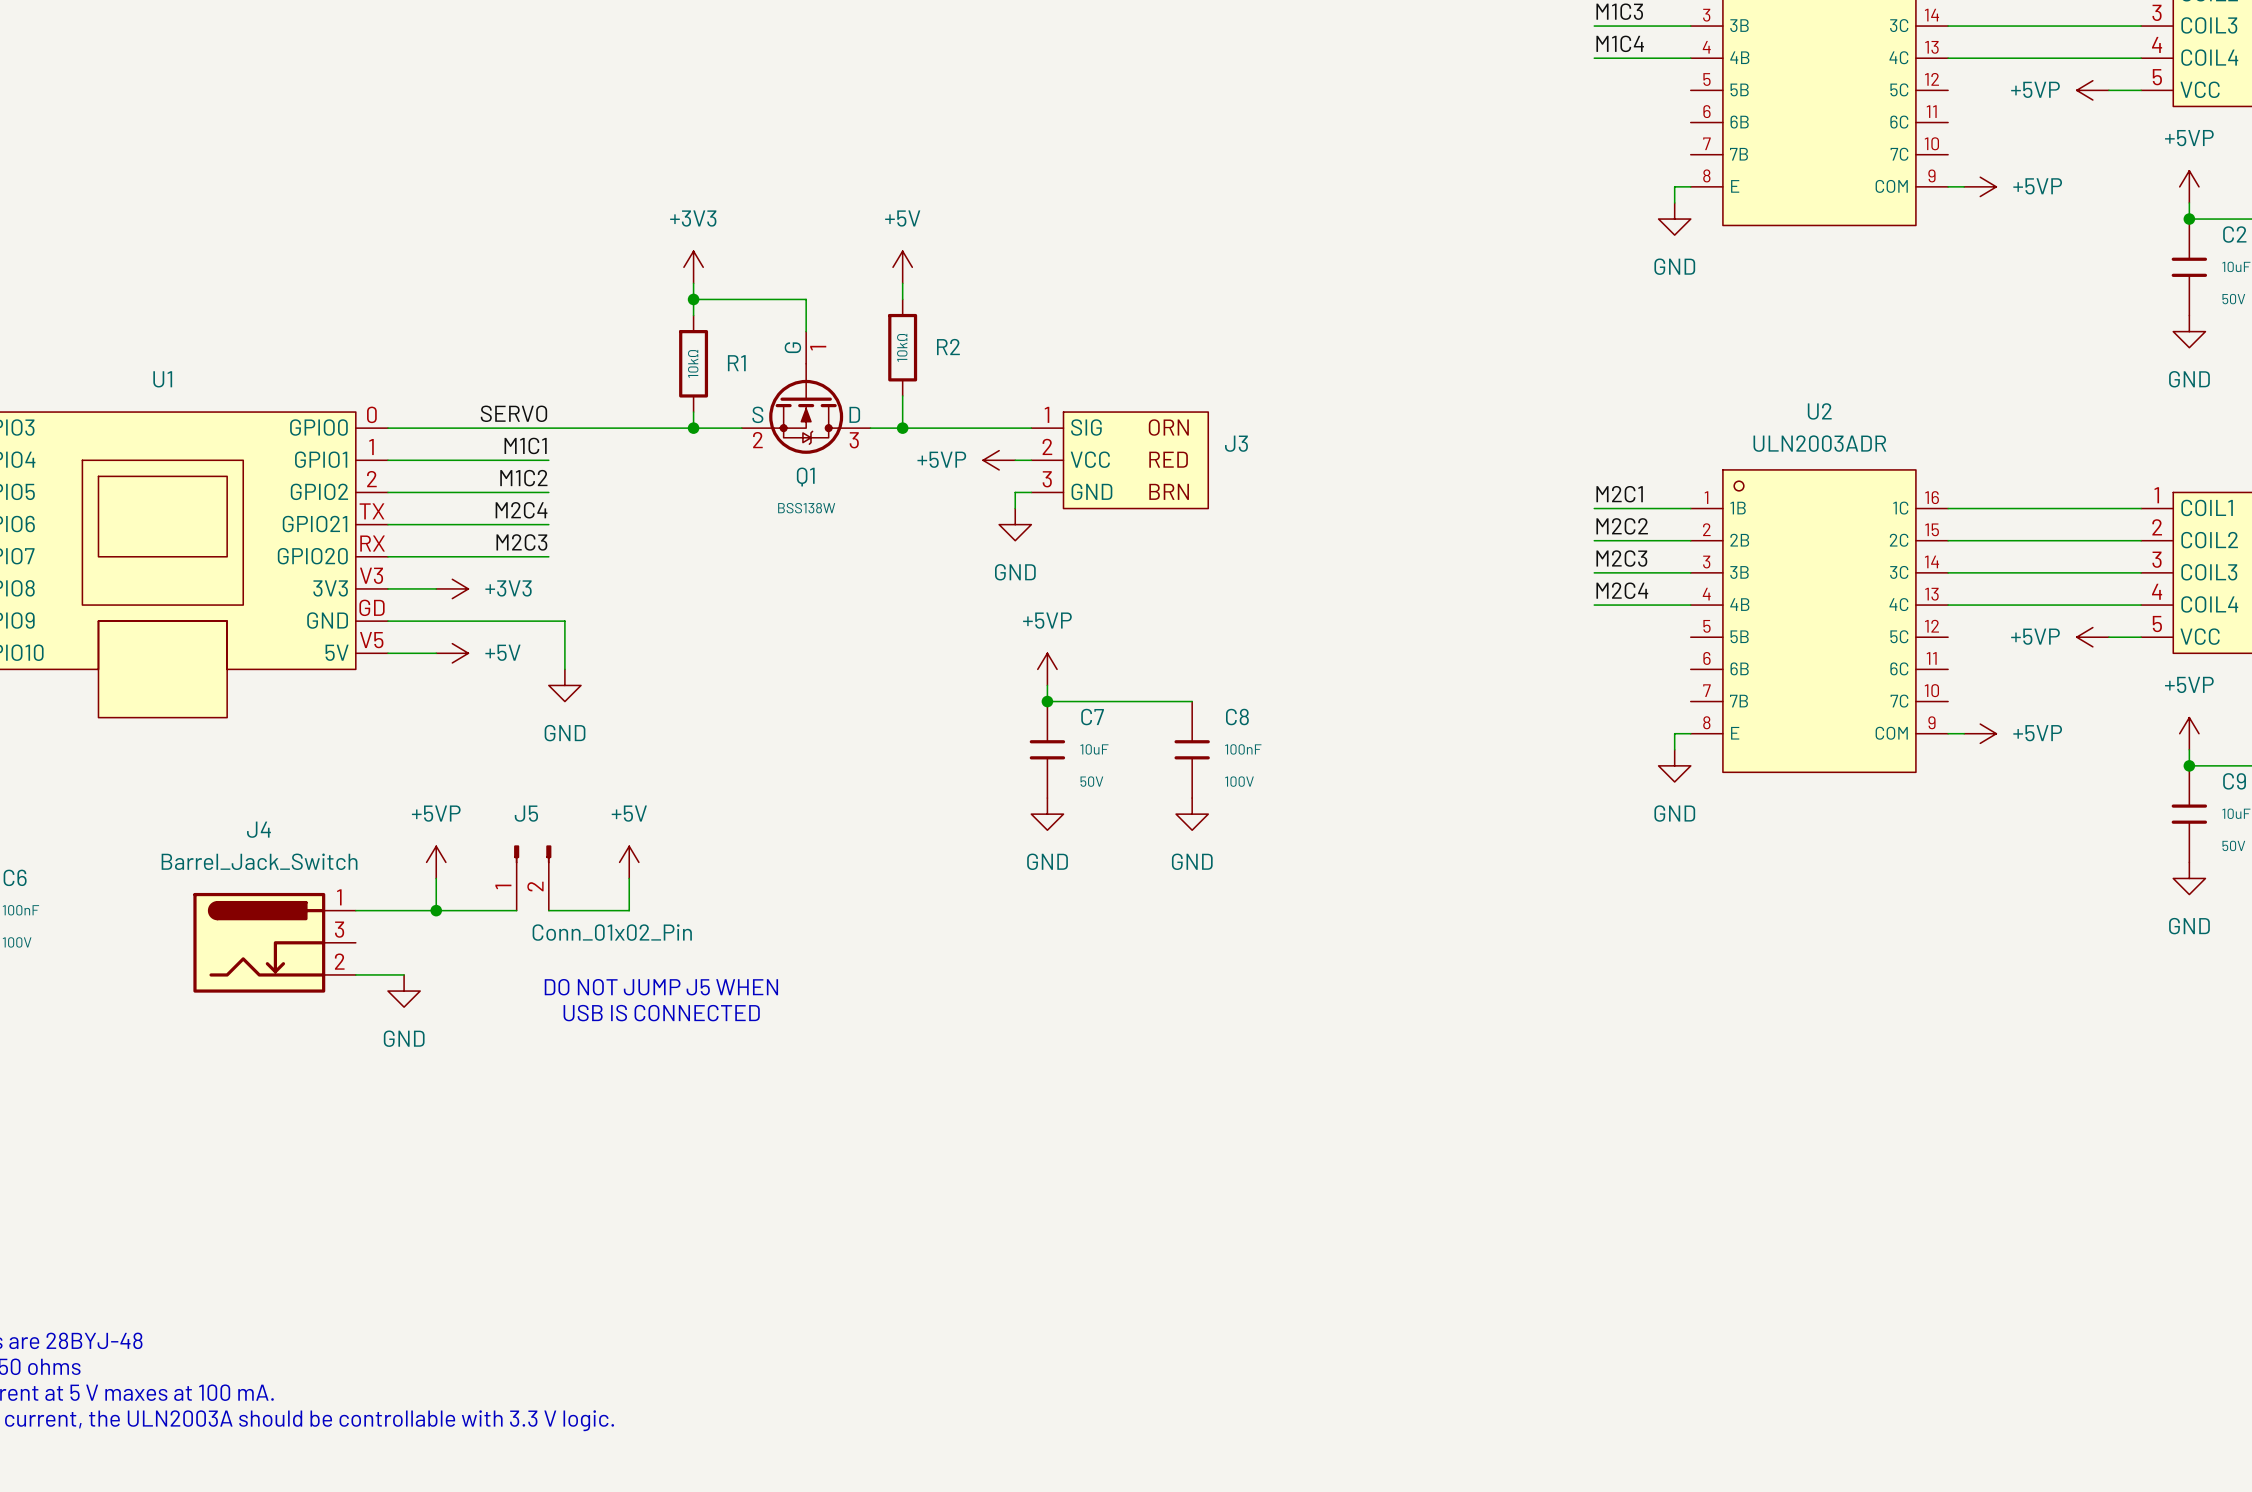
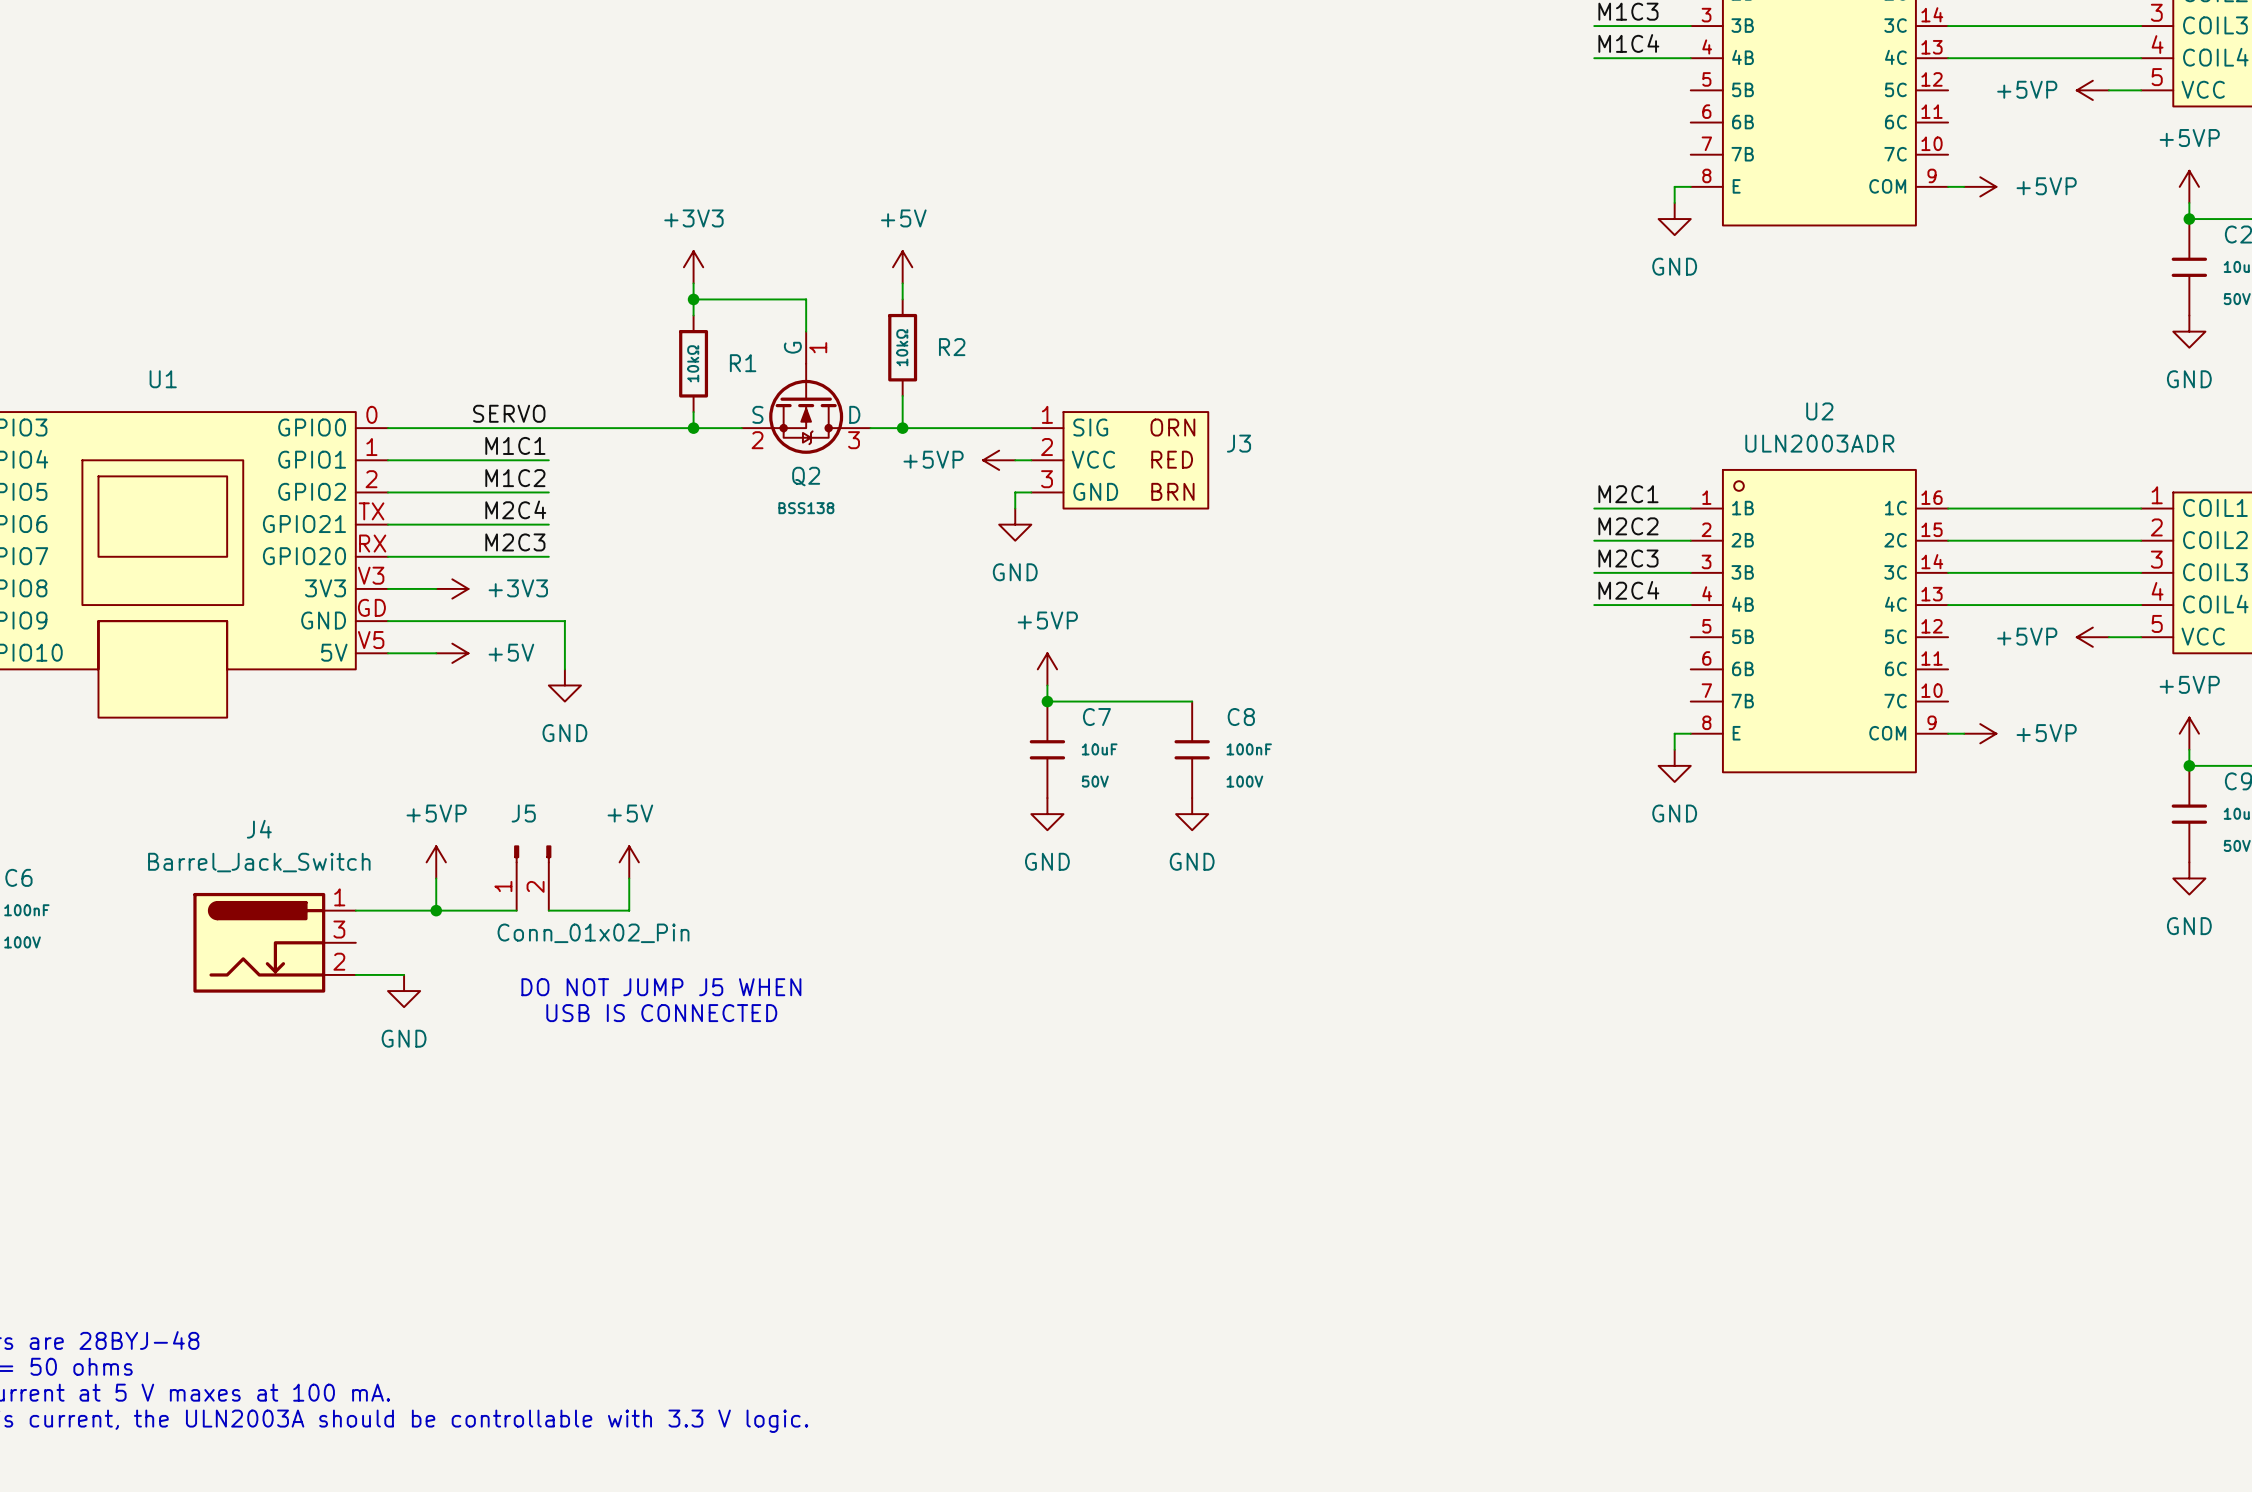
Q1 name: Q1 (805, 477) -> Q2 (806, 476)
Q1 value: BSS138W (806, 508) -> BSS138 (806, 508)

